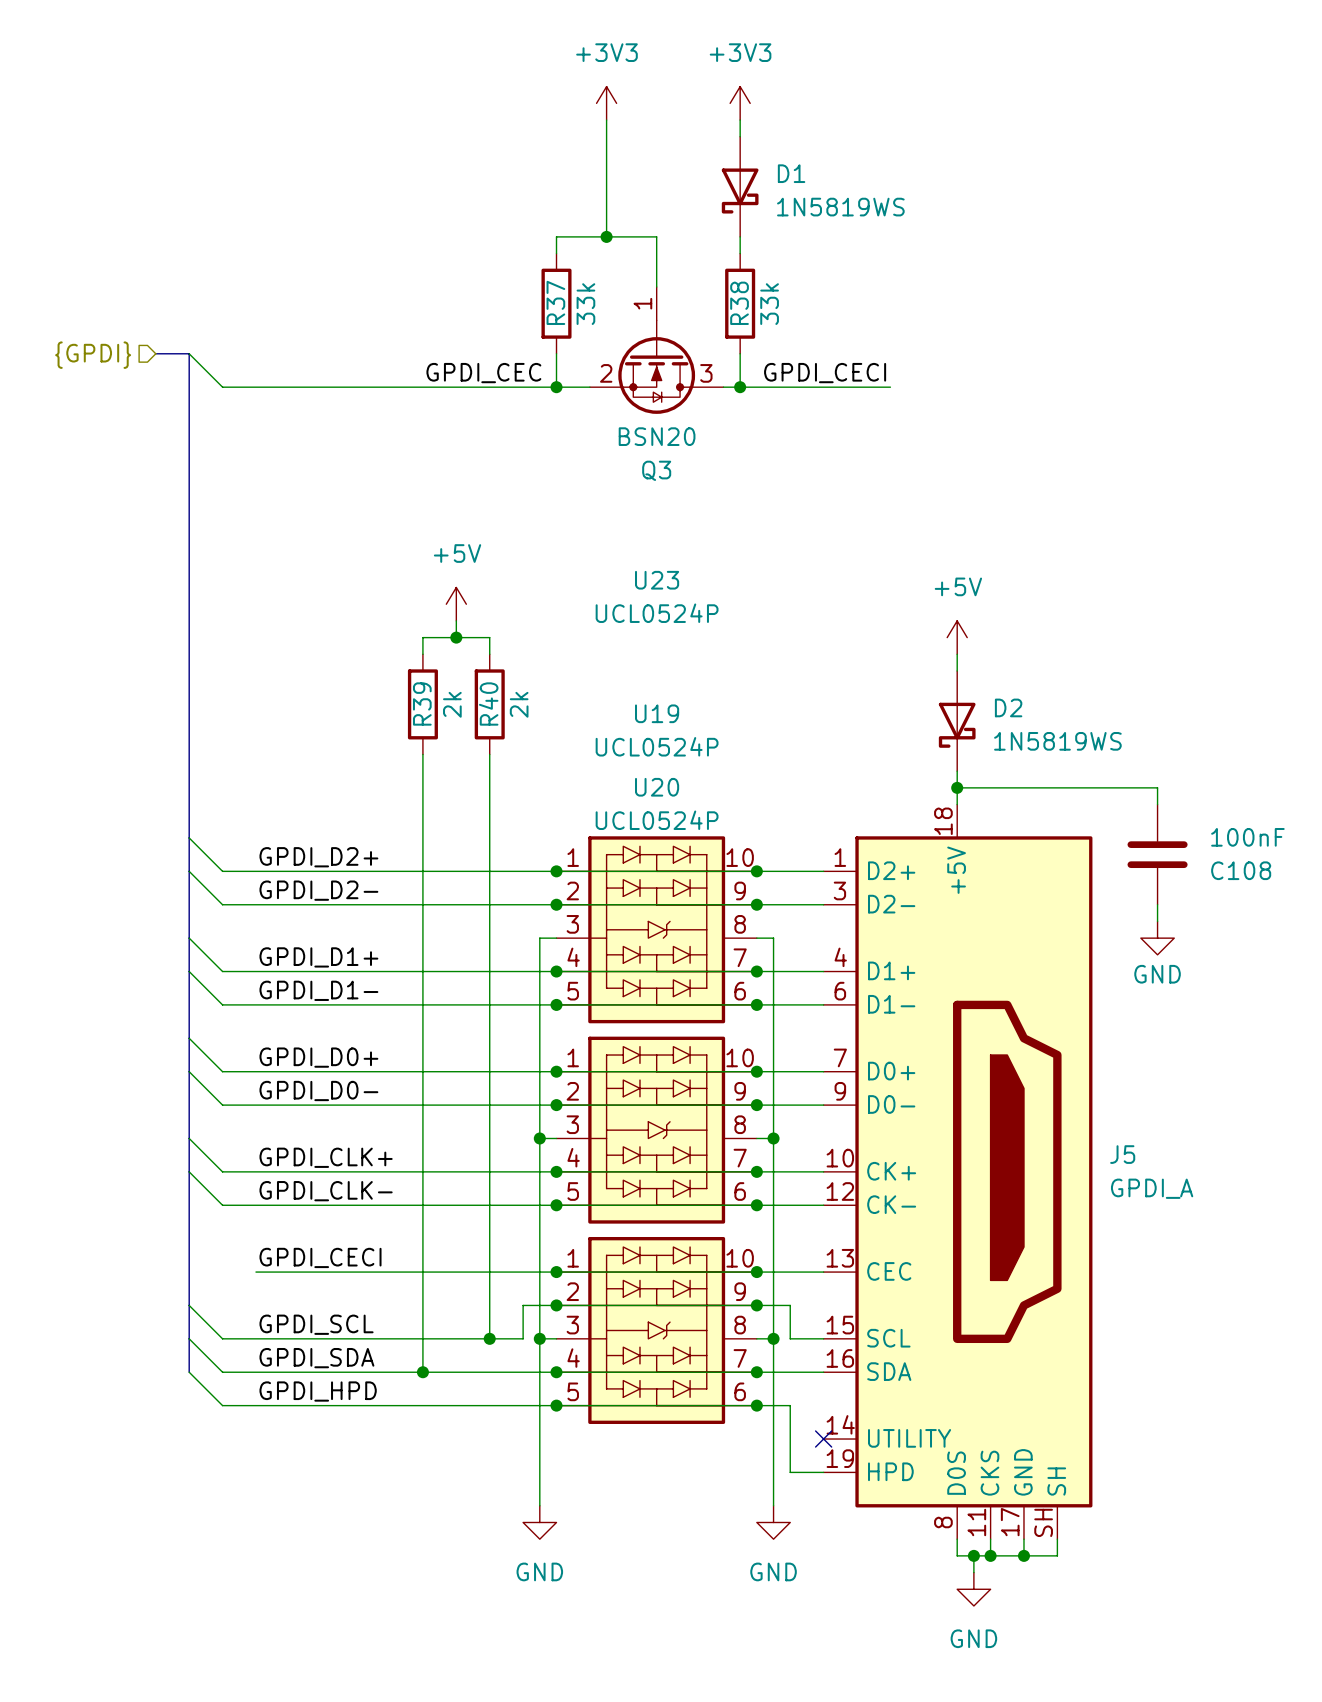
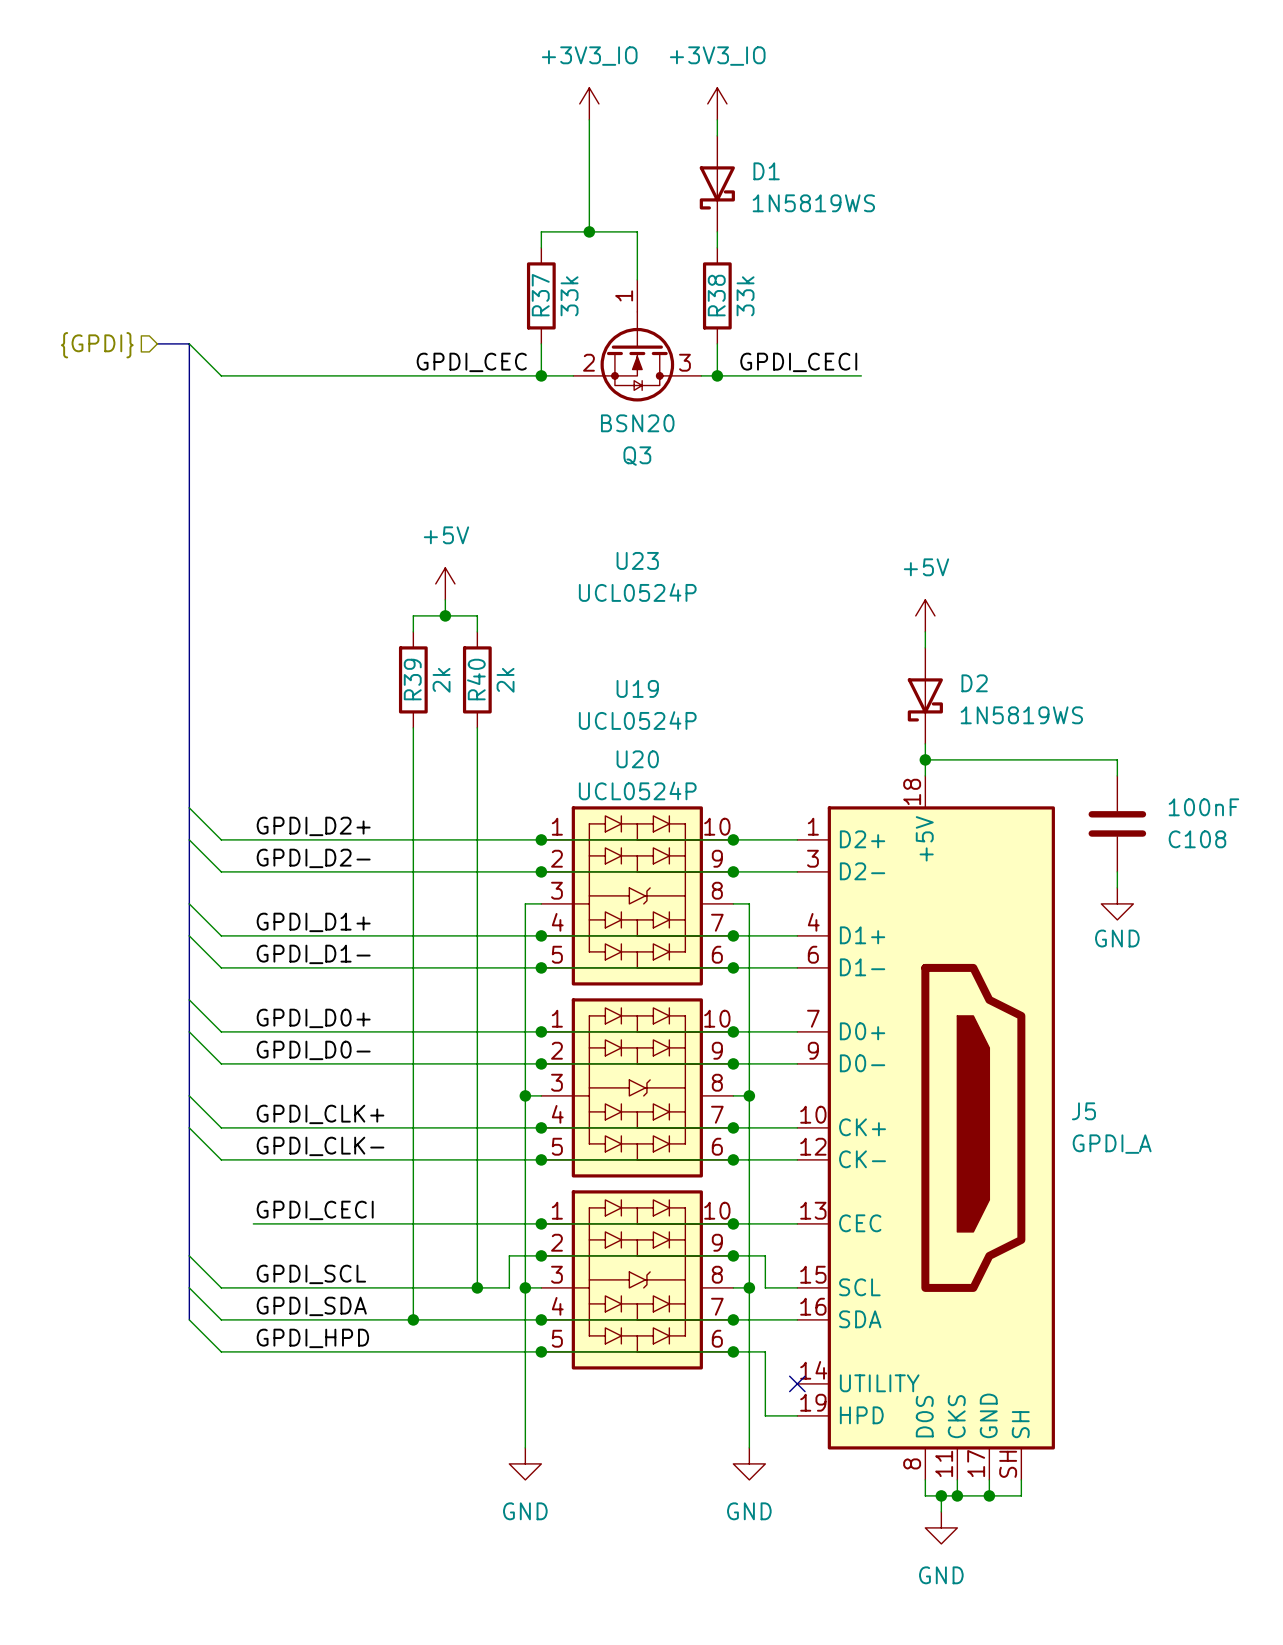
power symbol: +3V3 (606, 103) -> +3V3_IO (589, 103)
power symbol: +3V3 (740, 103) -> +3V3_IO (717, 103)

